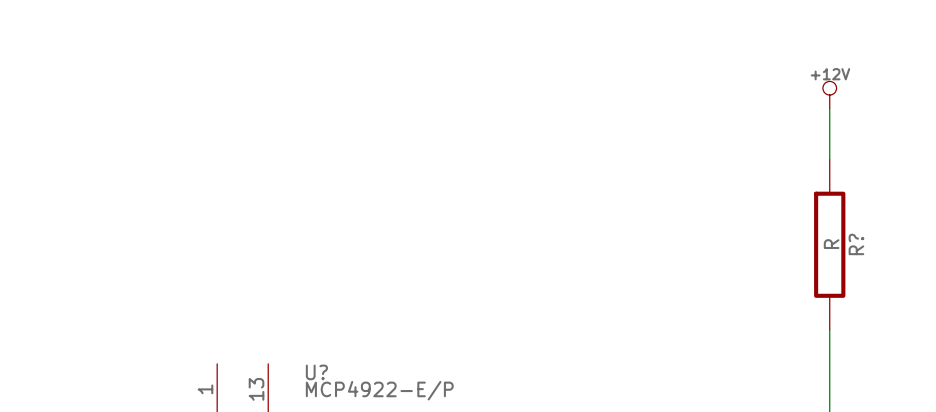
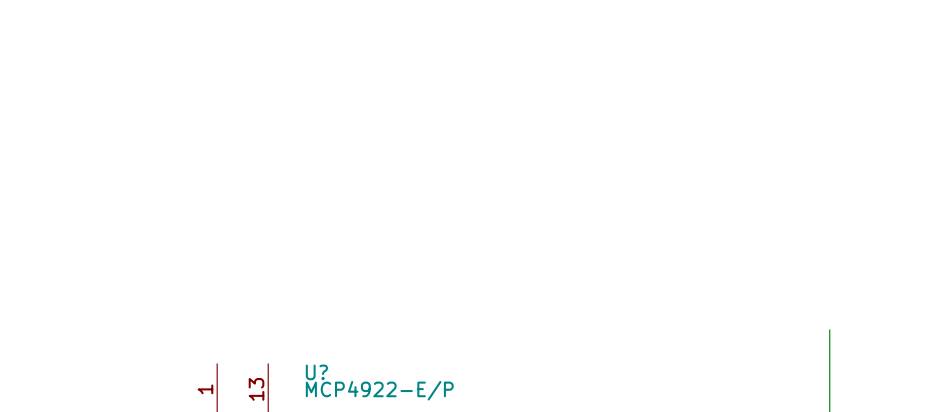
power symbol: +12V (829, 95) -> none
wire: (829, 108) (829, 159) -> none
R?: R (829, 244) -> none

